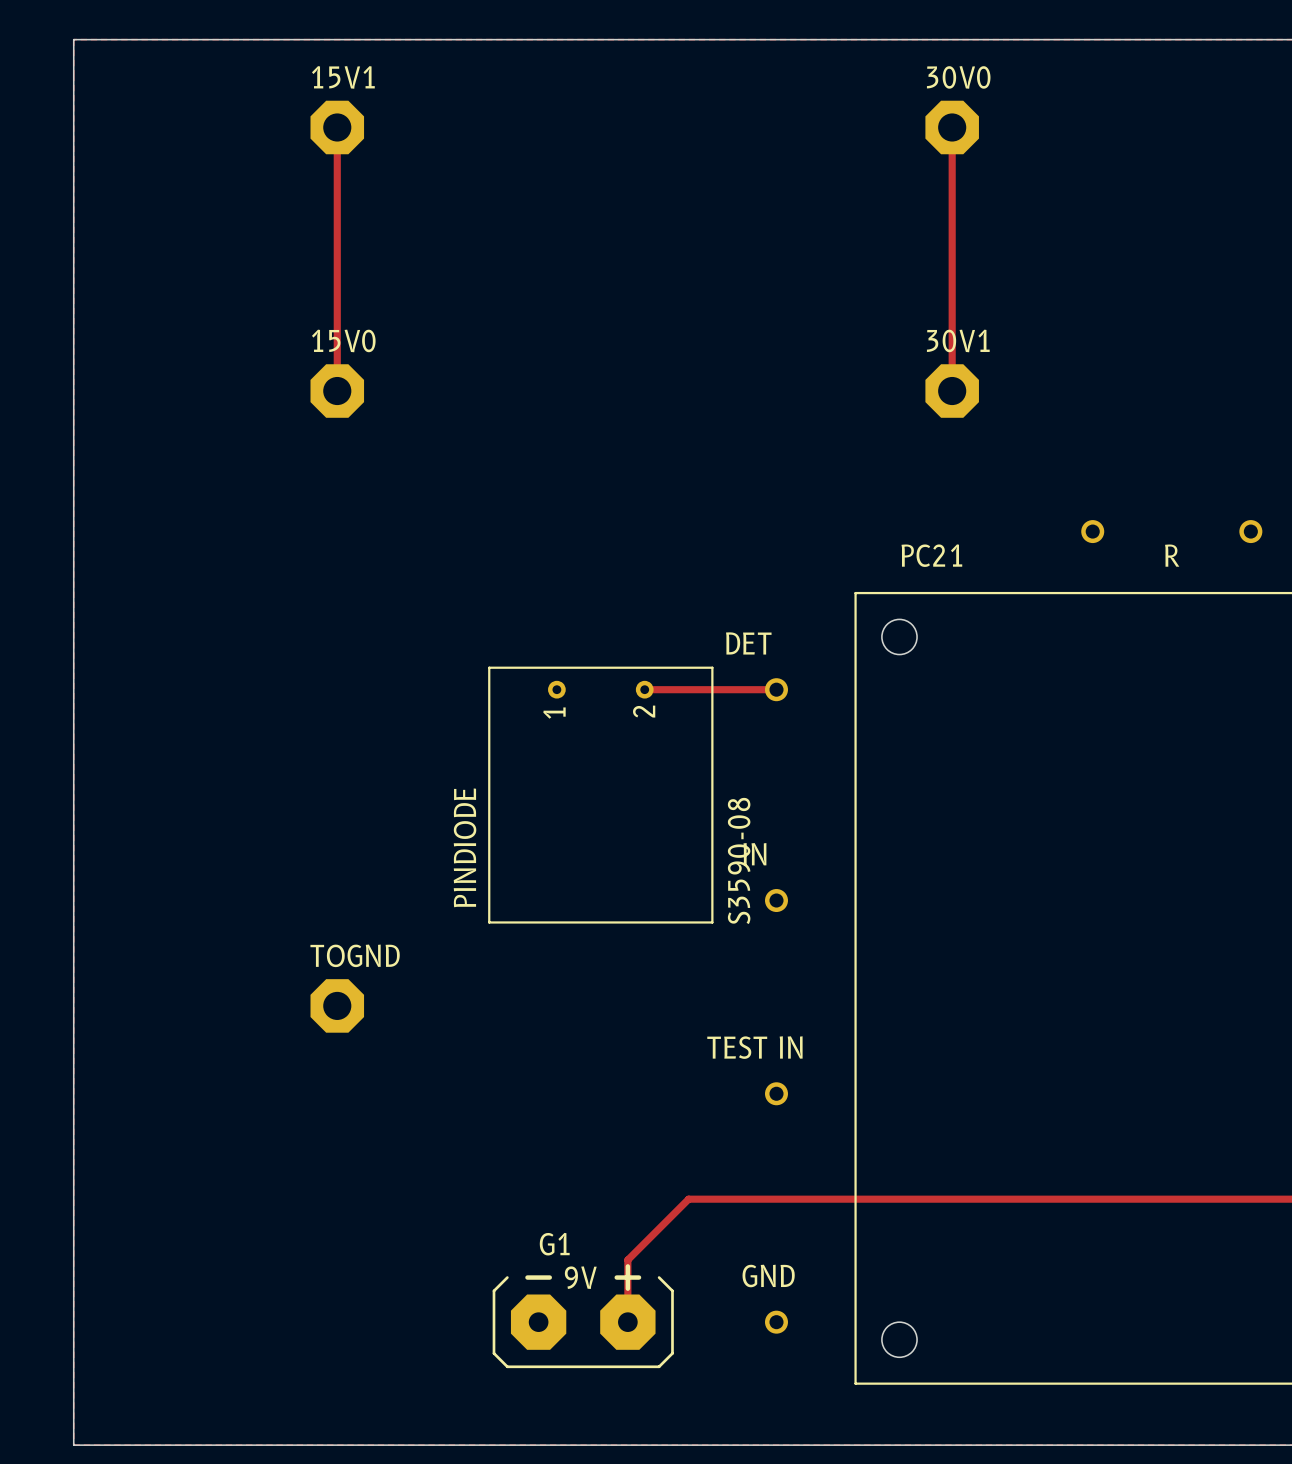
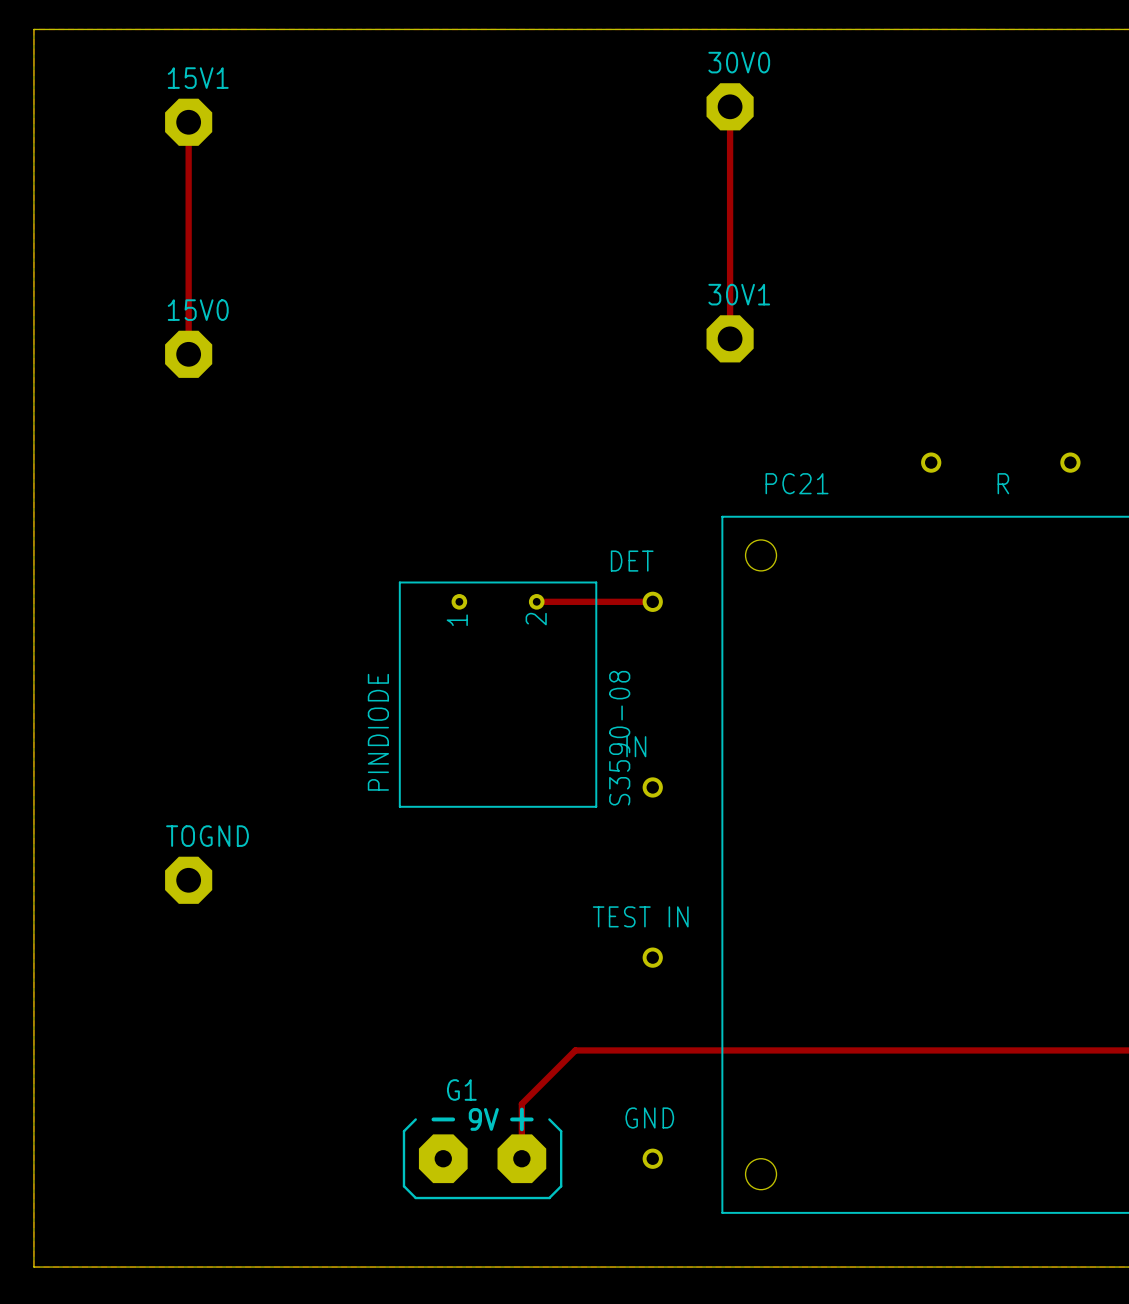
top track: (337, 127) (337, 391) -> (188, 122) (188, 354)
15V1 position: (337, 127) -> (188, 122)
top track: (952, 127) (952, 391) -> (730, 106) (730, 338)
30V0 position: (952, 127) -> (730, 106)
15V0 position: (337, 391) -> (188, 354)
30V1 position: (952, 391) -> (730, 338)
TOGND position: (337, 1005) -> (188, 880)

